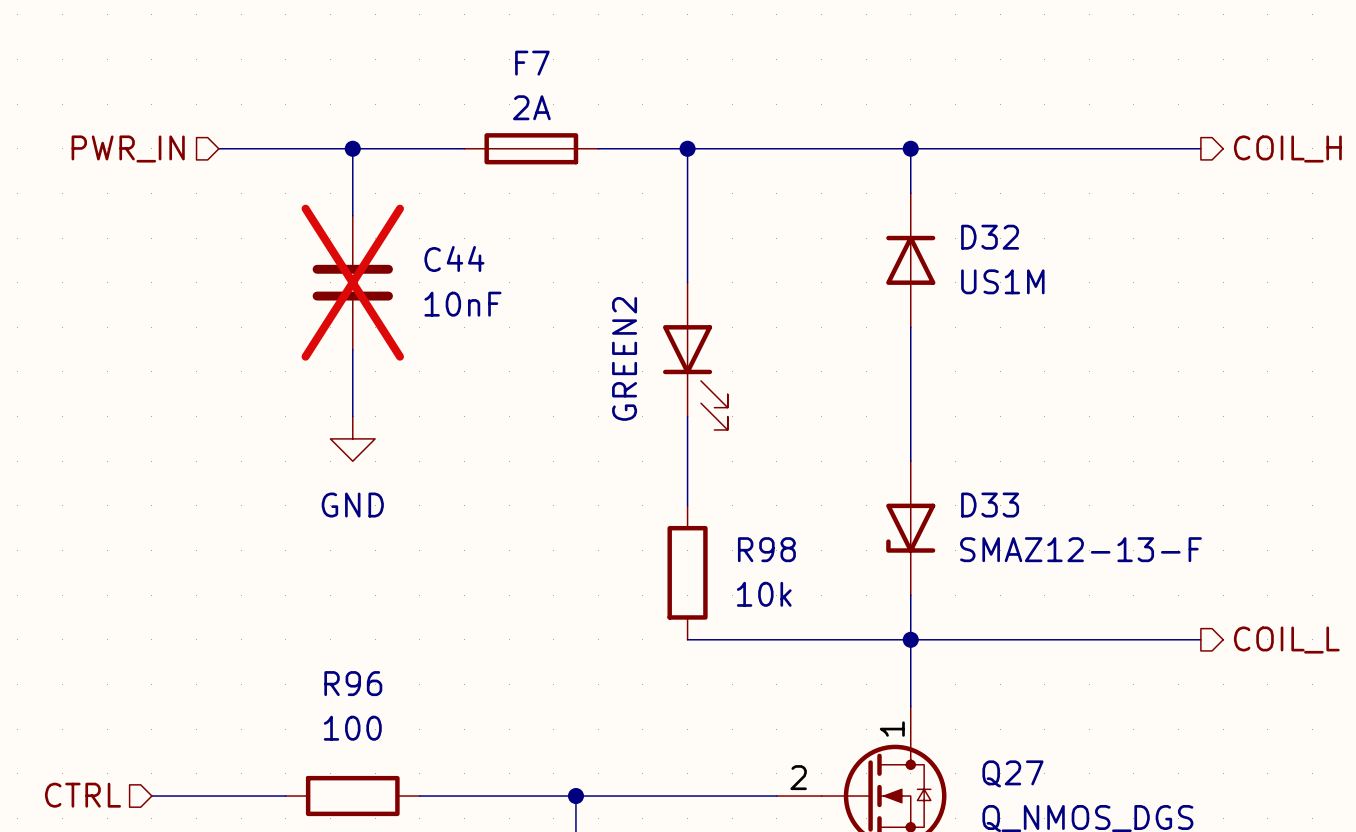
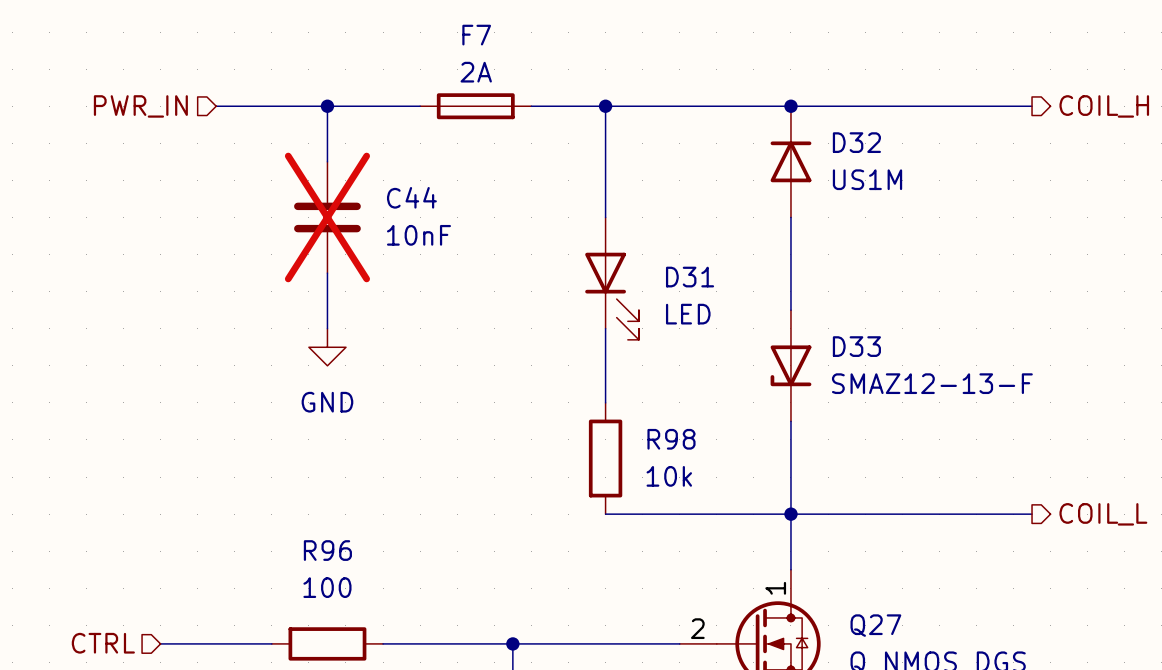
D32 position: (910, 260) -> (790, 161)
GREEN2 name: GREEN2 (624, 358) -> D31 (690, 277)
GREEN2 value: none -> LED (688, 314)
D33 position: (910, 528) -> (790, 365)

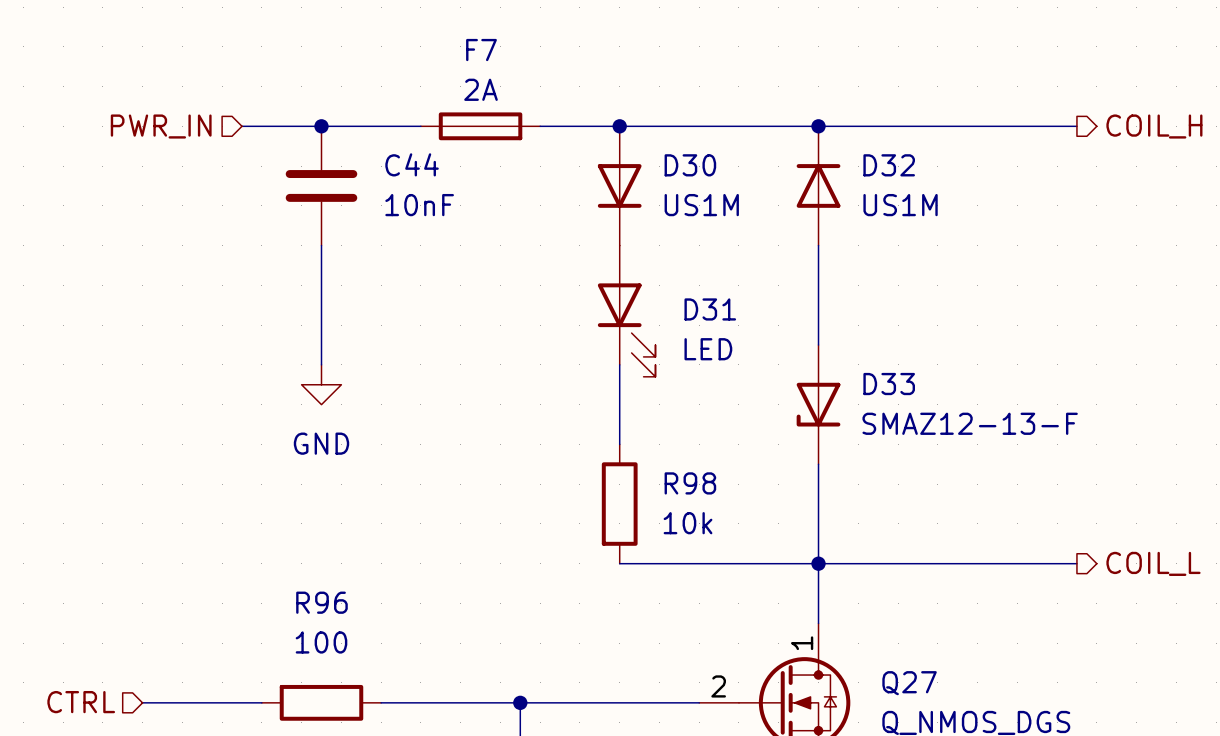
hierarchical label position: PWR_IN (140, 106) -> PWR_IN (161, 126)
wire: (216, 106) (253, 106) -> none
D30: none -> US1M (619, 185)
C44 position: (327, 217) -> (321, 185)
C44 do-not-place cross: (327, 217) -> none

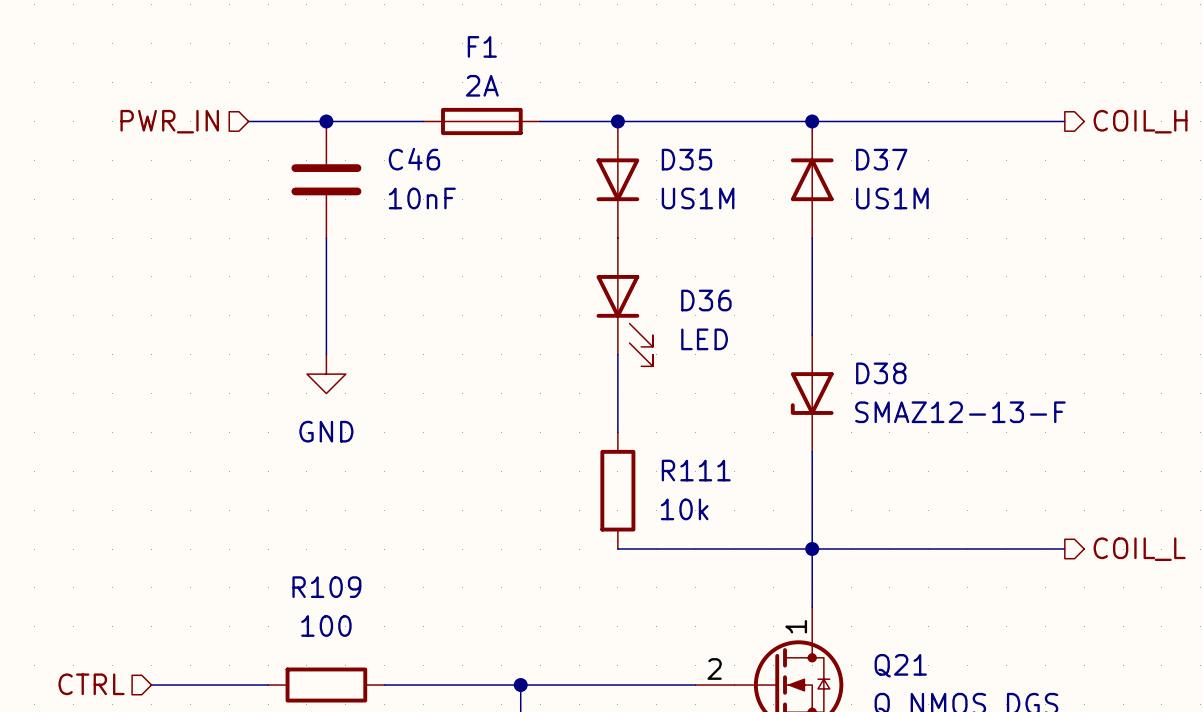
F7 name: F7 (481, 50) -> F1 (482, 46)
C44 name: C44 (412, 164) -> C46 (414, 159)
D30 name: D30 (690, 165) -> D35 (686, 159)
D32 name: D32 (889, 165) -> D37 (881, 159)
D31 name: D31 (710, 309) -> D36 (706, 300)
D33 name: D33 (889, 384) -> D38 (881, 373)
R98 name: R98 (690, 483) -> R111 (696, 470)
R96 name: R96 (321, 602) -> R109 (326, 587)
Q27 name: Q27 (909, 683) -> Q21 (900, 665)

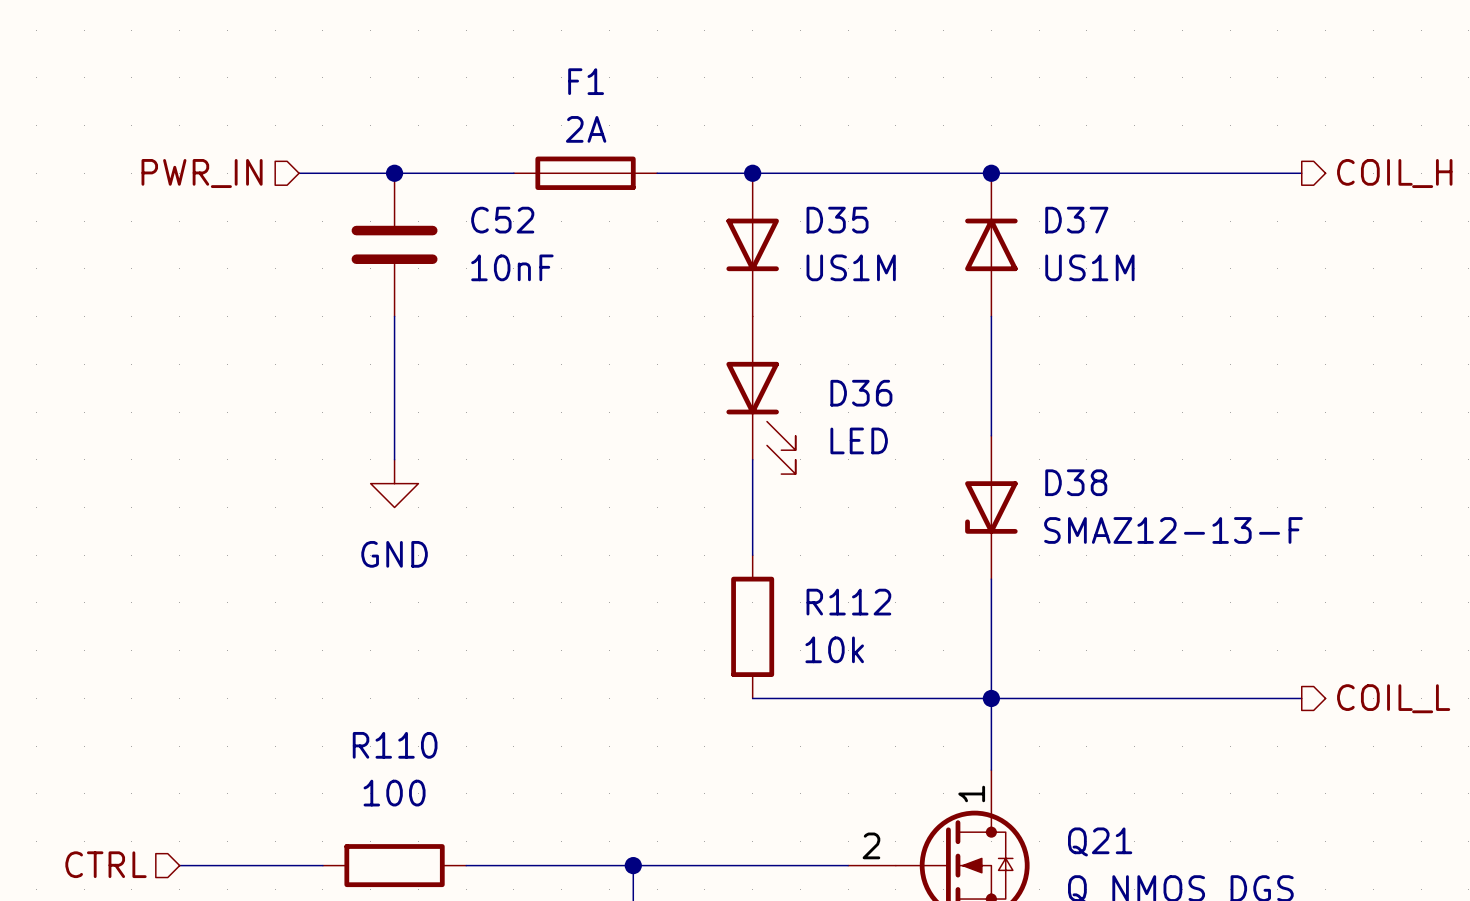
C46 name: C46 (414, 159) -> C52 (502, 220)
R111 name: R111 (696, 470) -> R112 (848, 602)
R109 name: R109 (326, 587) -> R110 (395, 745)

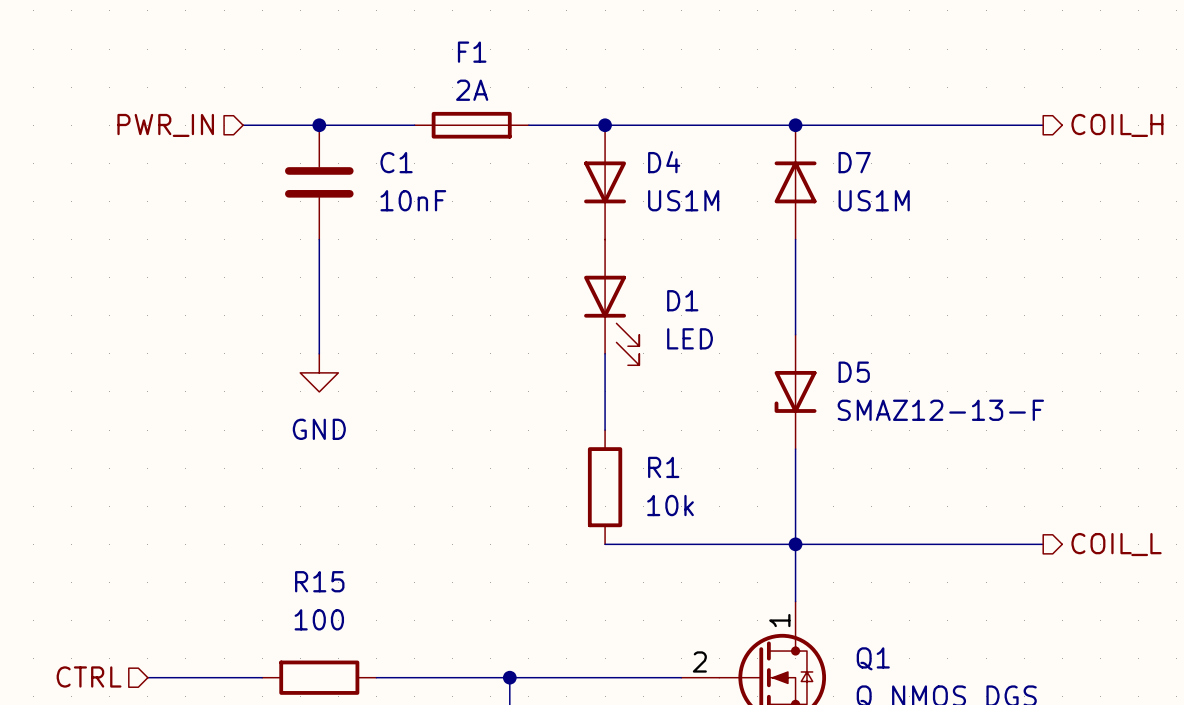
C52 name: C52 (502, 220) -> C1 (396, 162)
D35 name: D35 (837, 220) -> D4 (664, 162)
D37 name: D37 (1076, 220) -> D7 (854, 162)
D36 name: D36 (861, 393) -> D1 (682, 300)
D38 name: D38 (1076, 482) -> D5 (854, 372)
R112 name: R112 (848, 602) -> R1 (663, 467)
R110 name: R110 (395, 745) -> R15 (319, 581)
Q21 name: Q21 (1100, 841) -> Q1 (873, 658)

